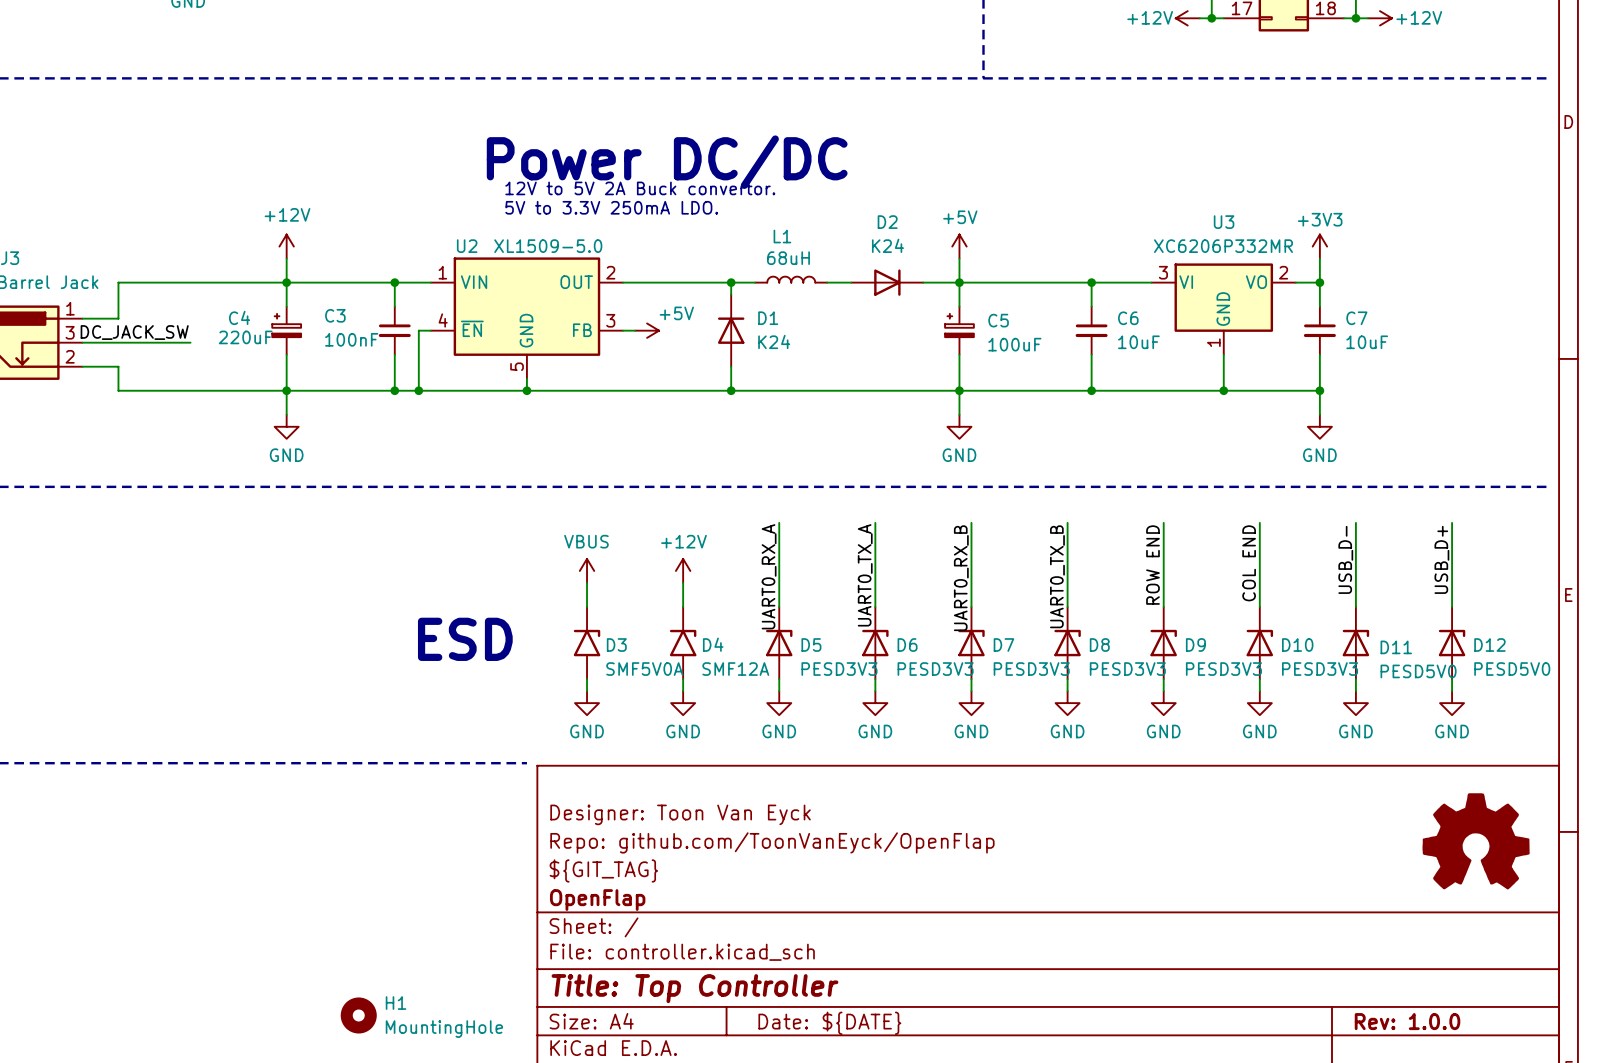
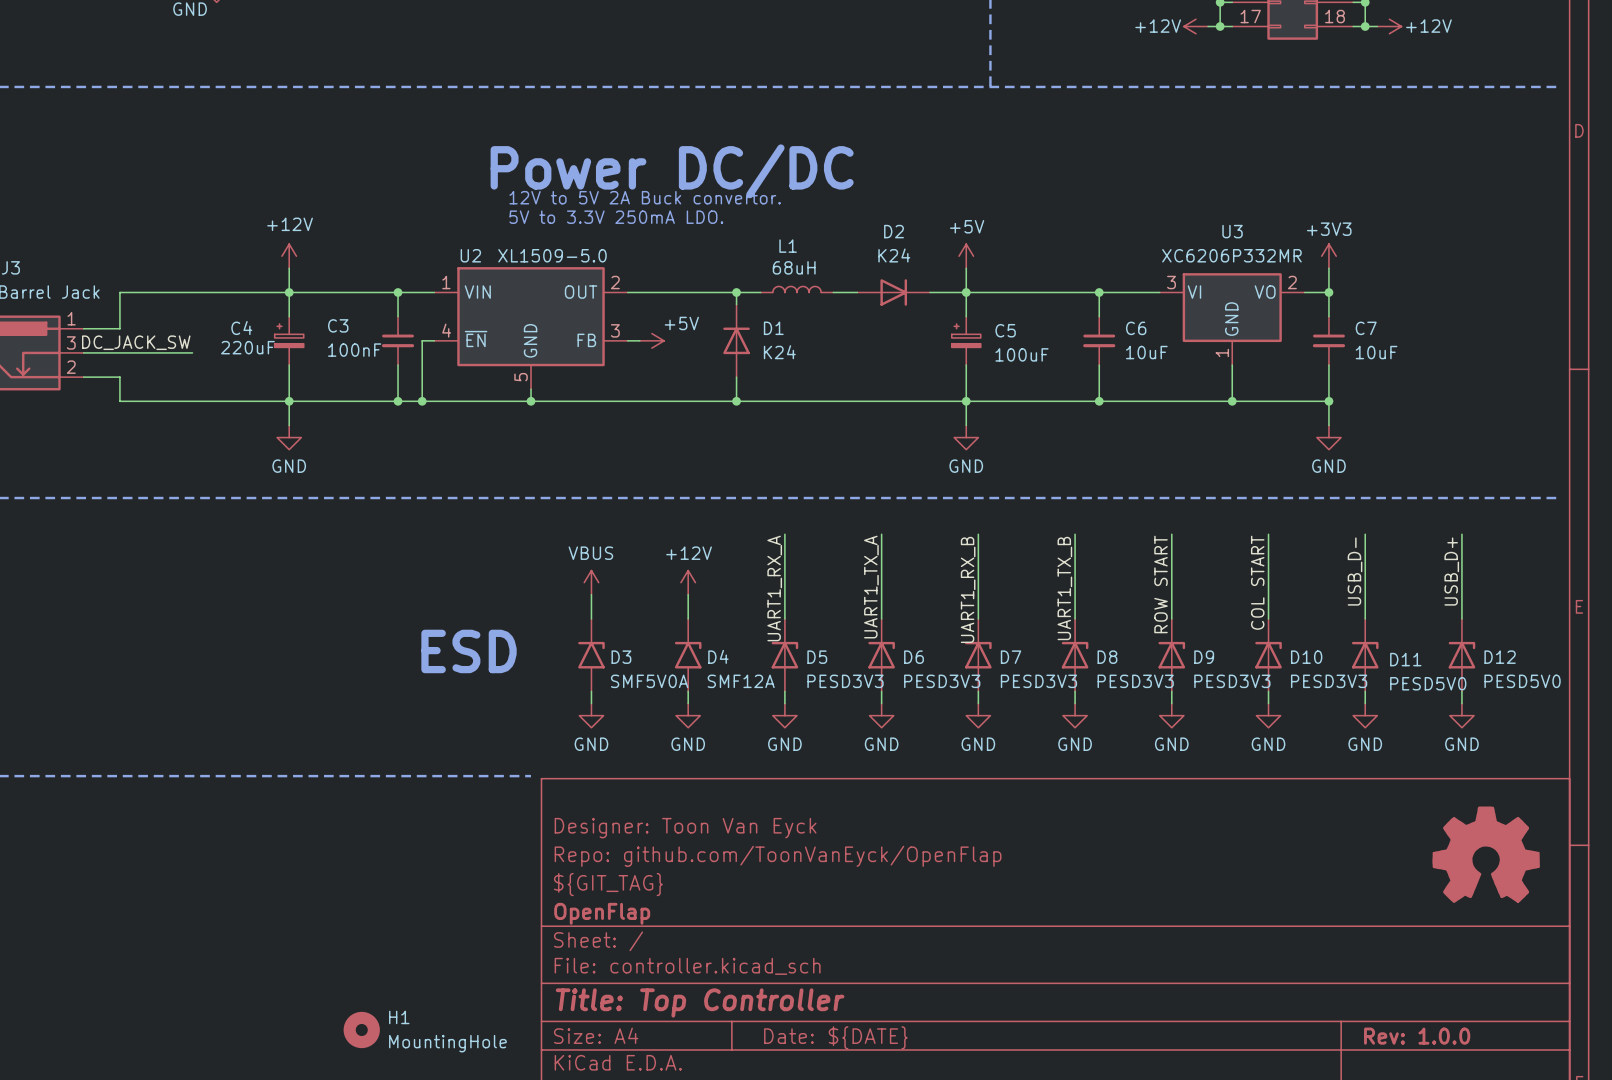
label: COL END (1249, 563) -> COL START (1257, 582)
label: ROW END (1152, 565) -> ROW START (1161, 584)
label: UART0_TX_A (865, 575) -> UART1_TX_A (871, 587)
label: UART0_RX_A (769, 576) -> UART1_RX_A (774, 588)
label: UART0_TX_B (1057, 576) -> UART1_TX_B (1064, 588)
label: UART0_RX_B (961, 578) -> UART1_RX_B (968, 589)

